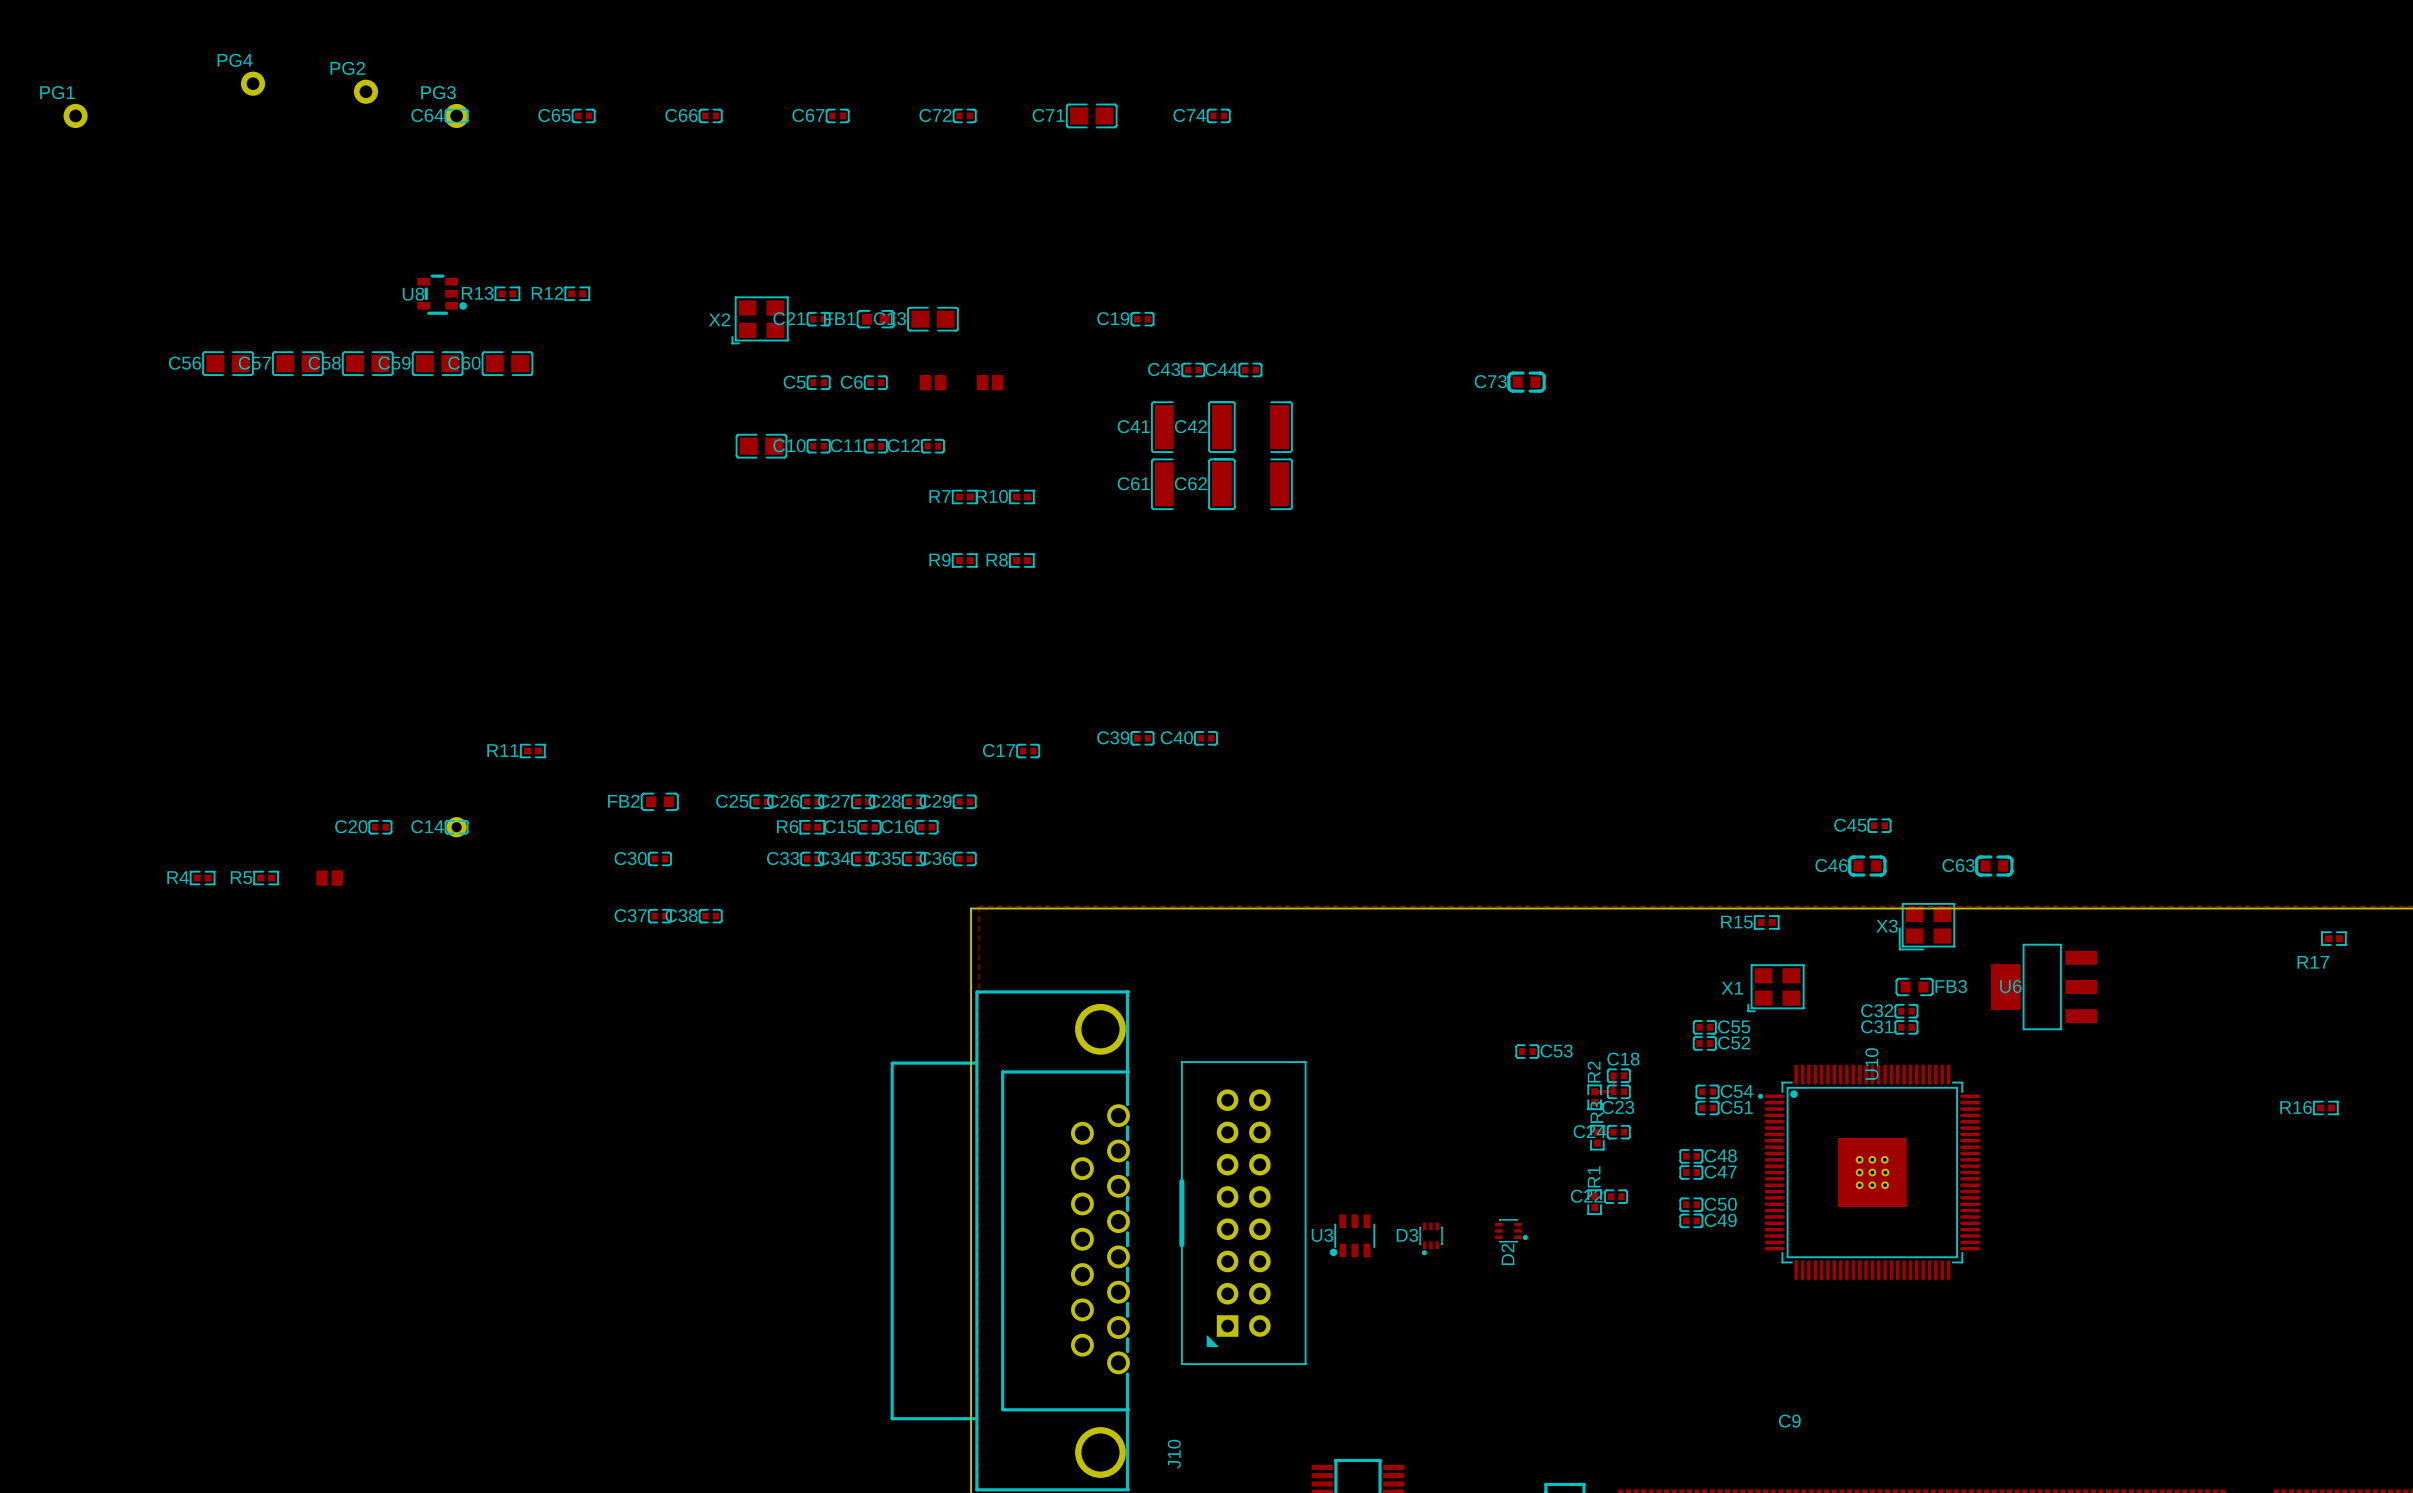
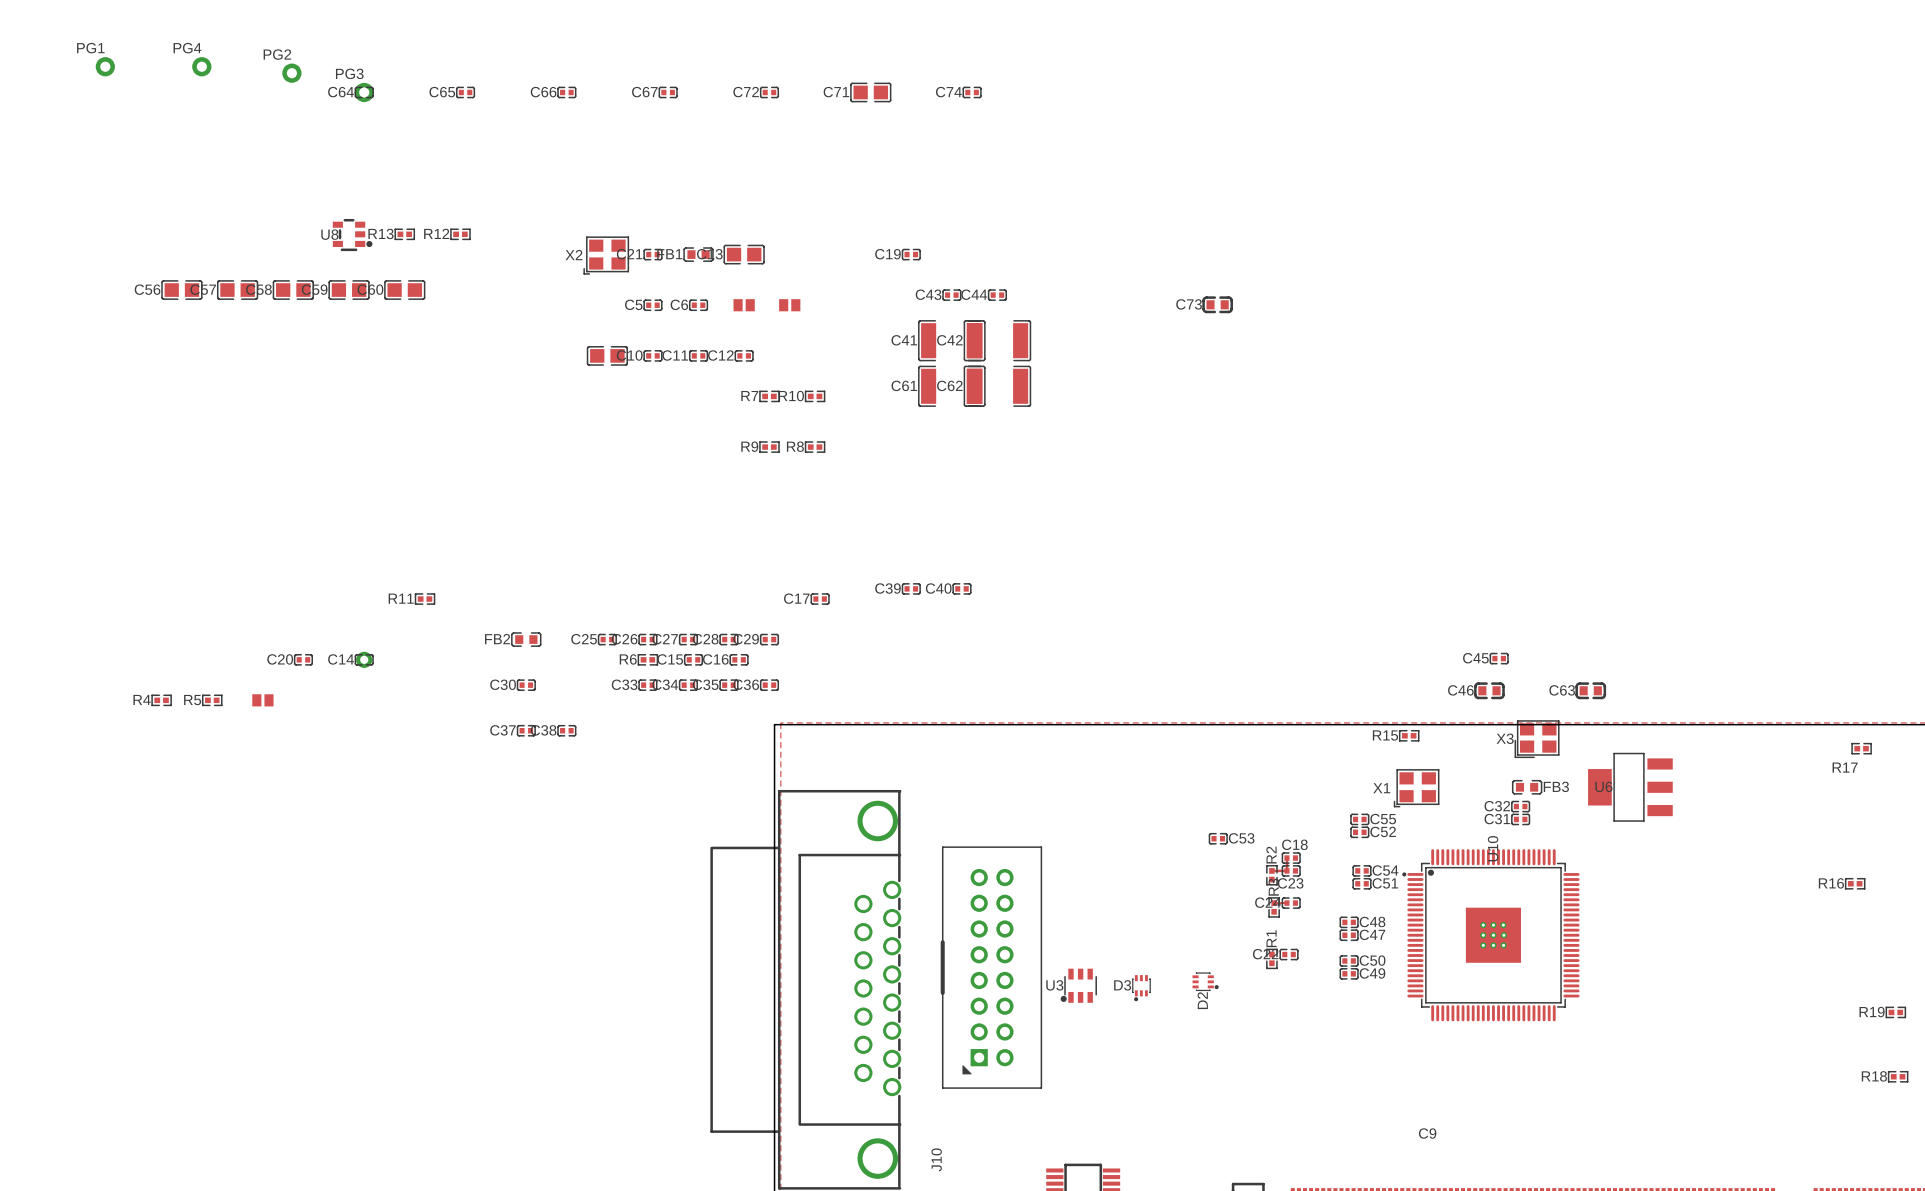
PG1 position: (75, 115) -> (105, 66)
R19: none -> (1895, 1012)
R18: none -> (1898, 1076)

